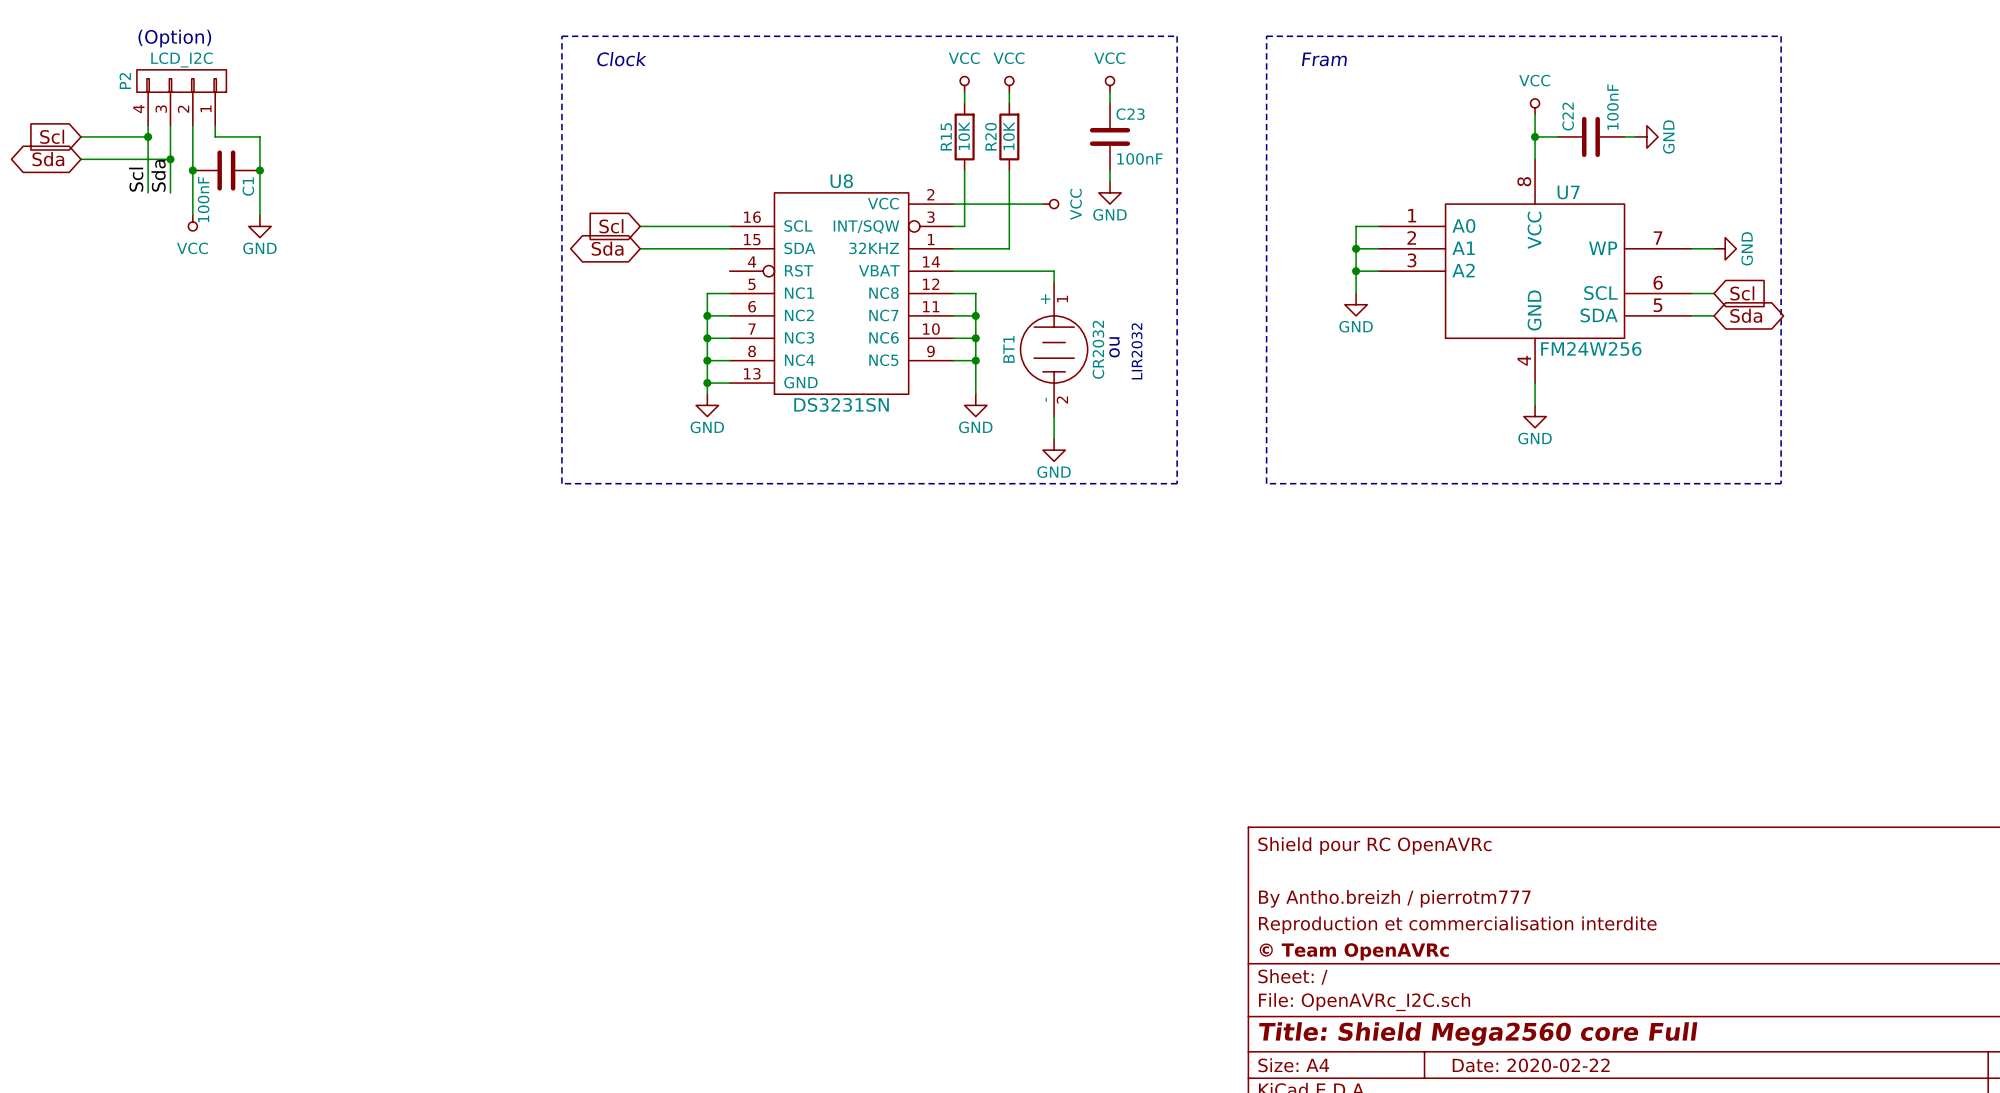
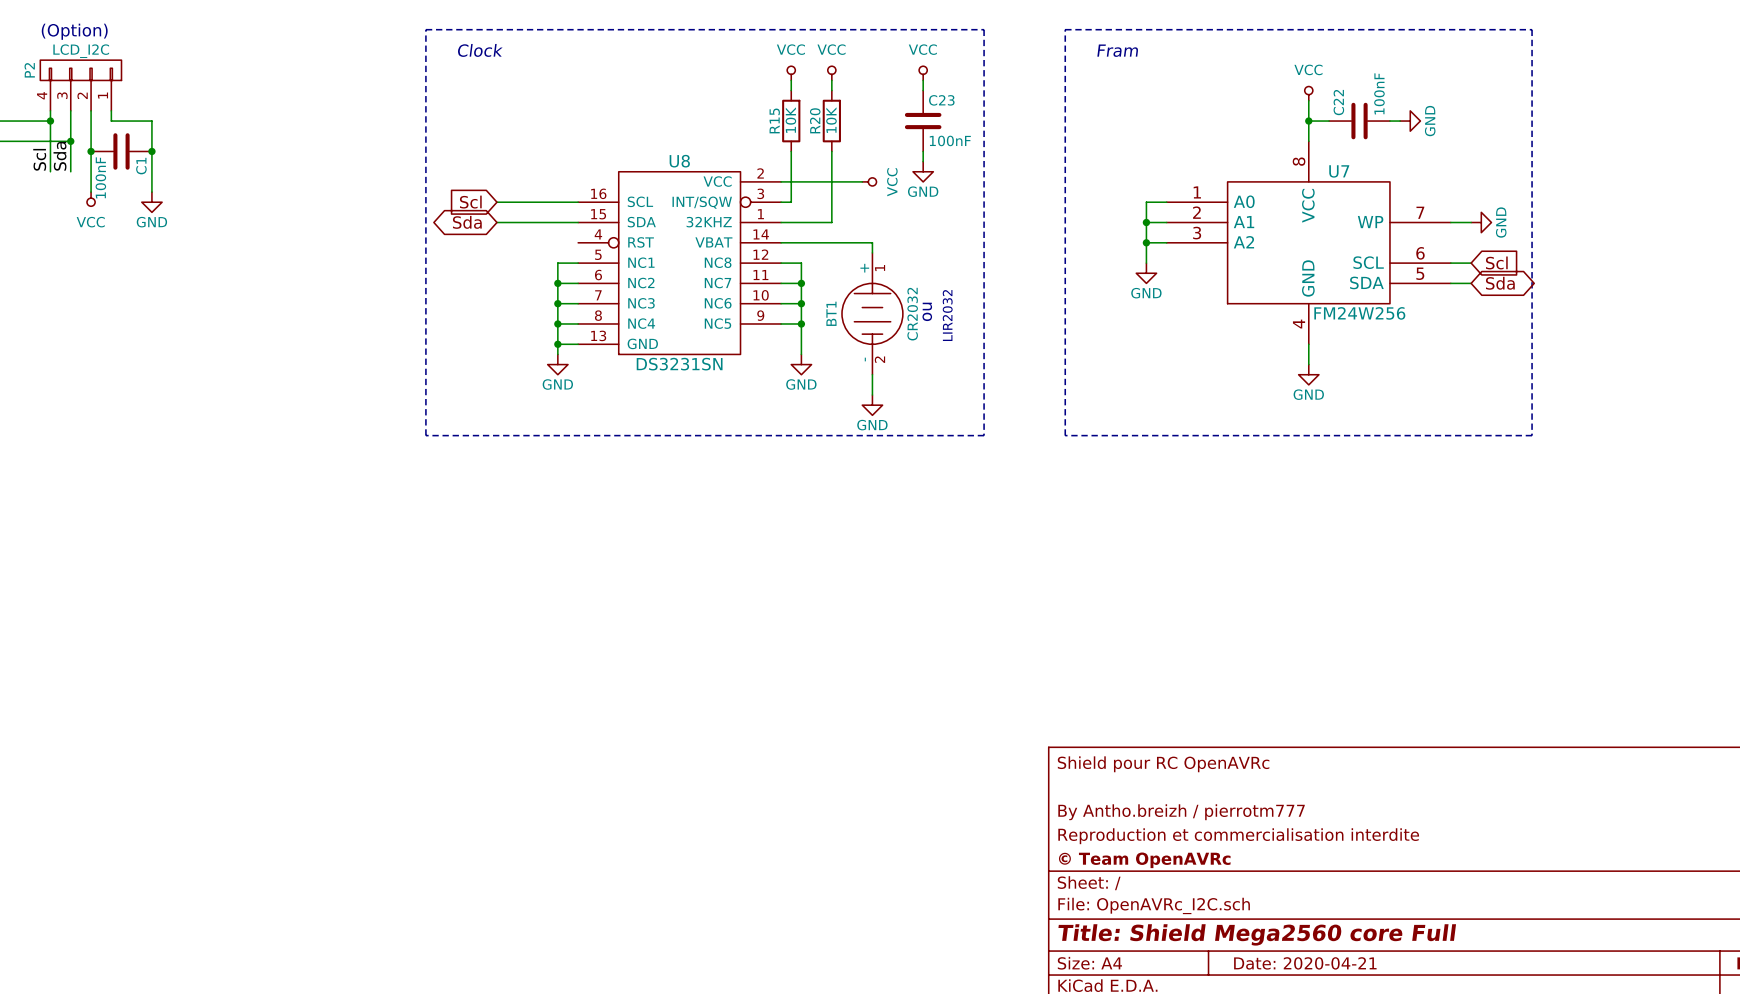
title block: Date: 2020-02-22 (1531, 1065) -> Date: 2020-04-21 (1305, 963)

